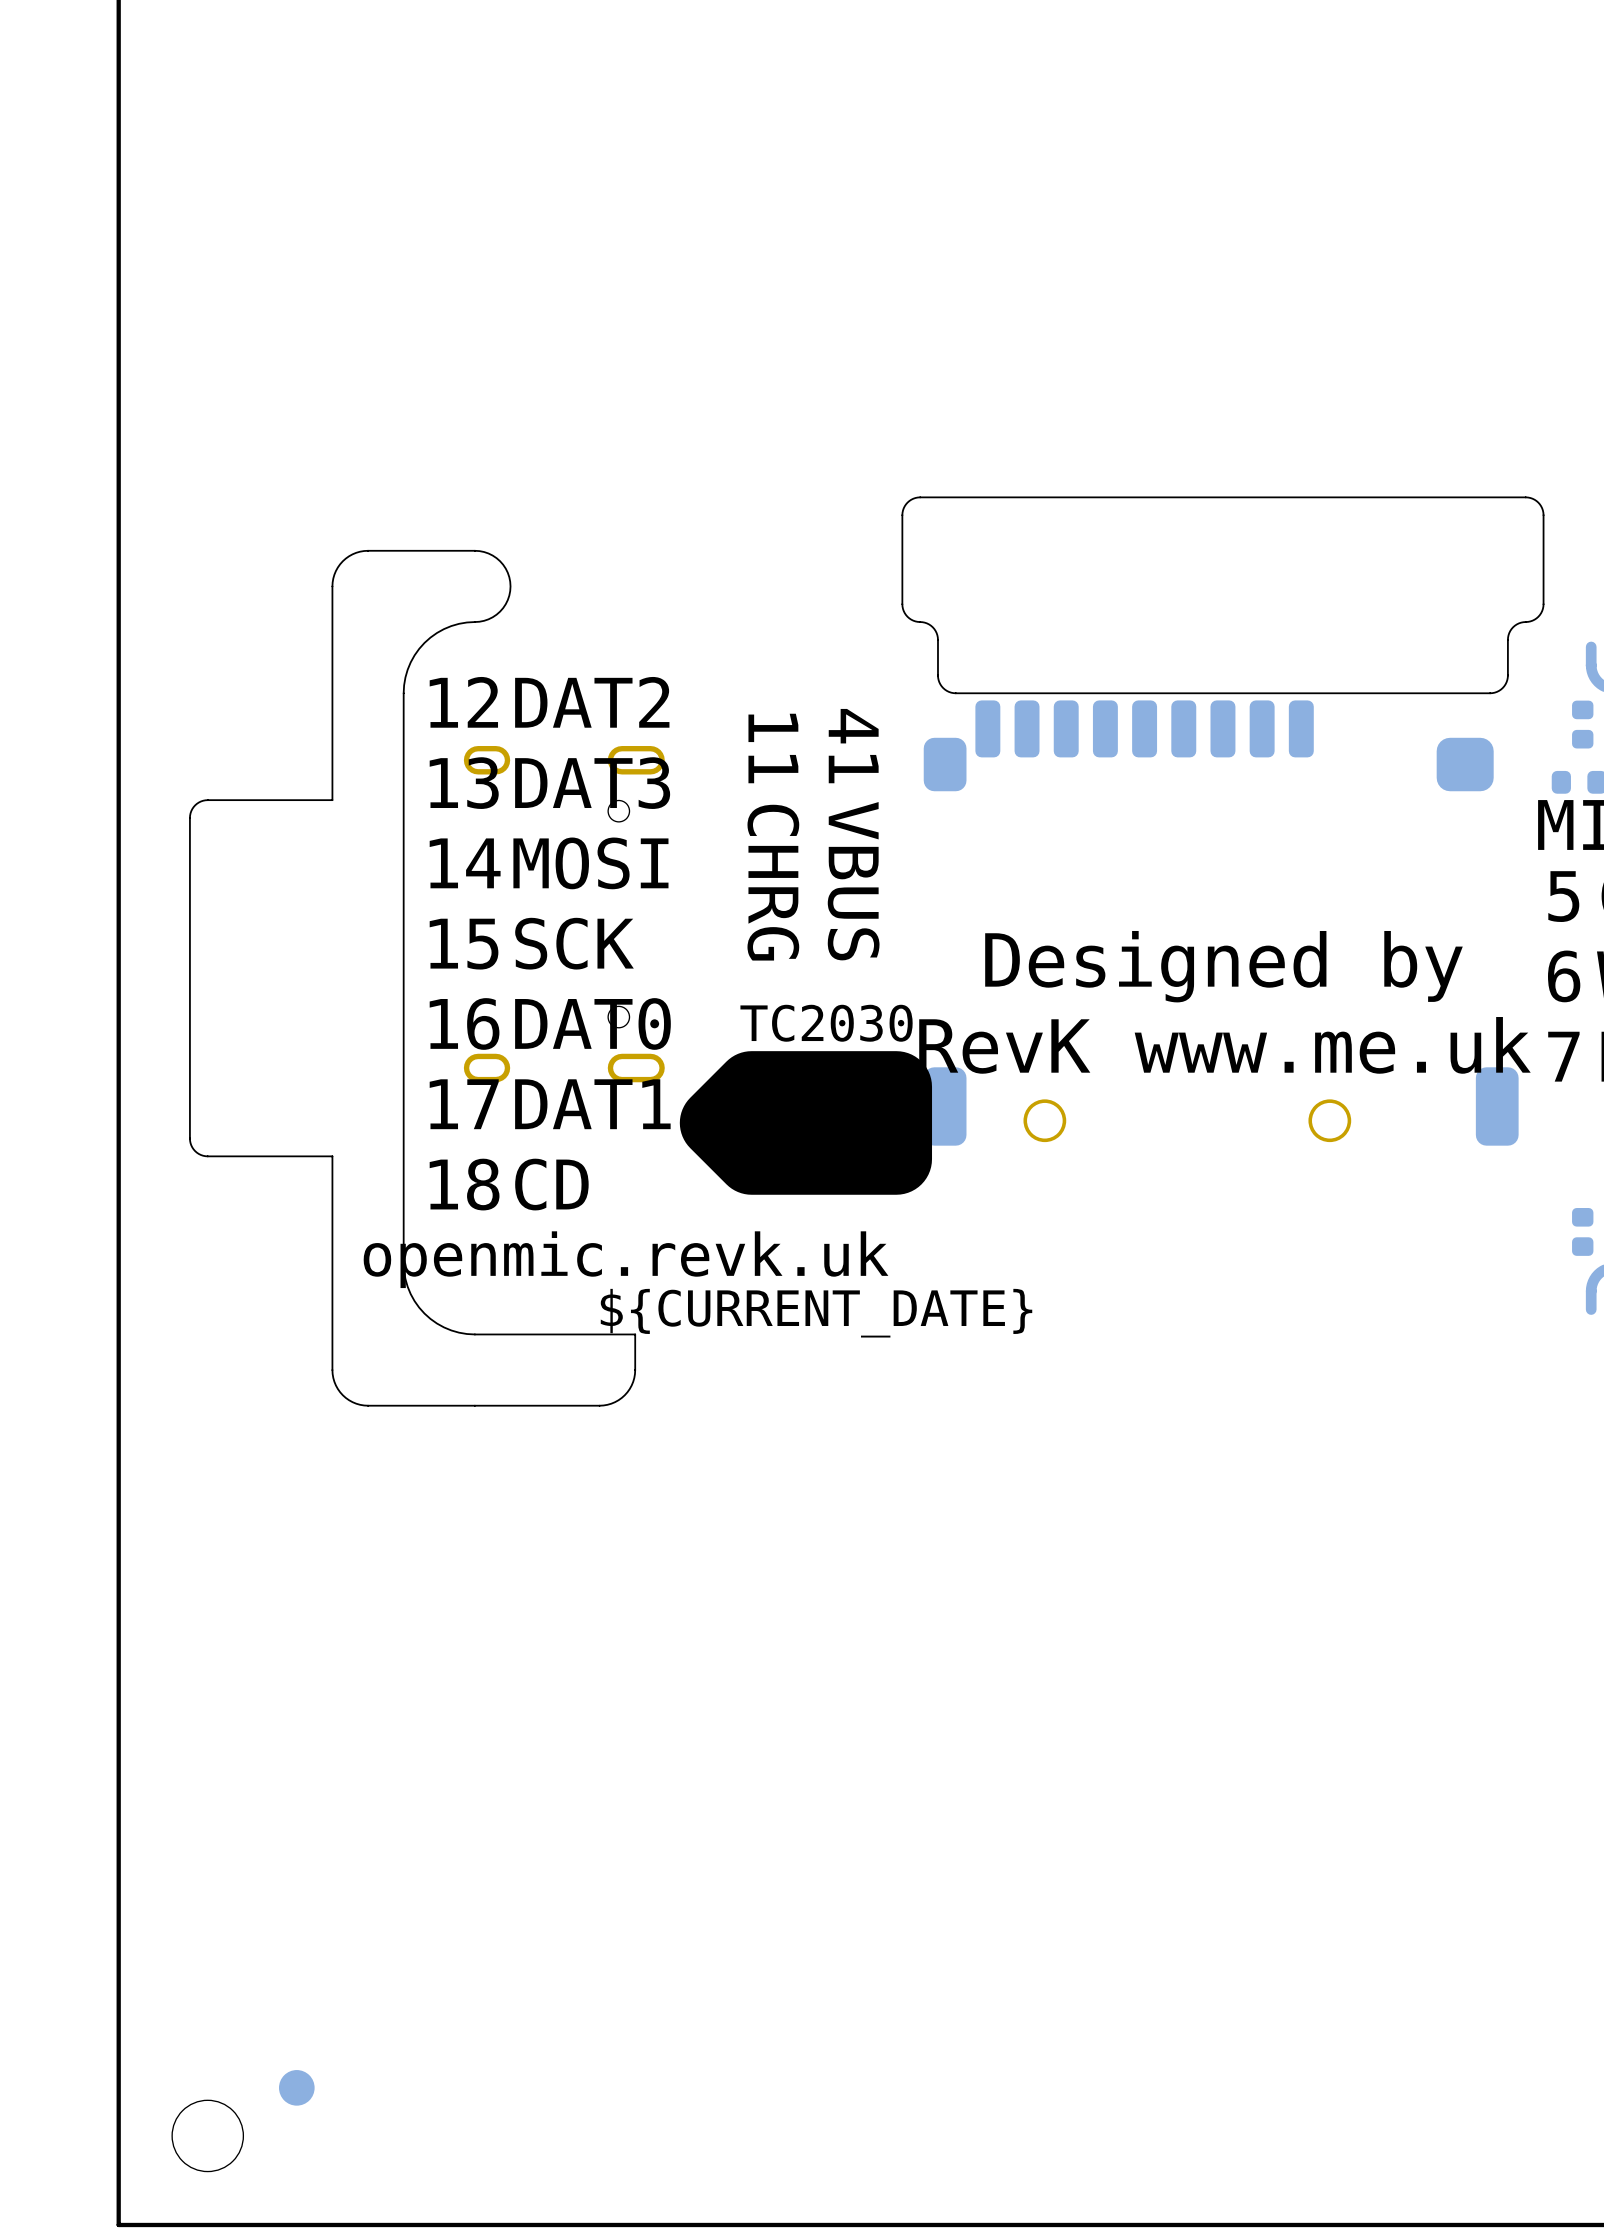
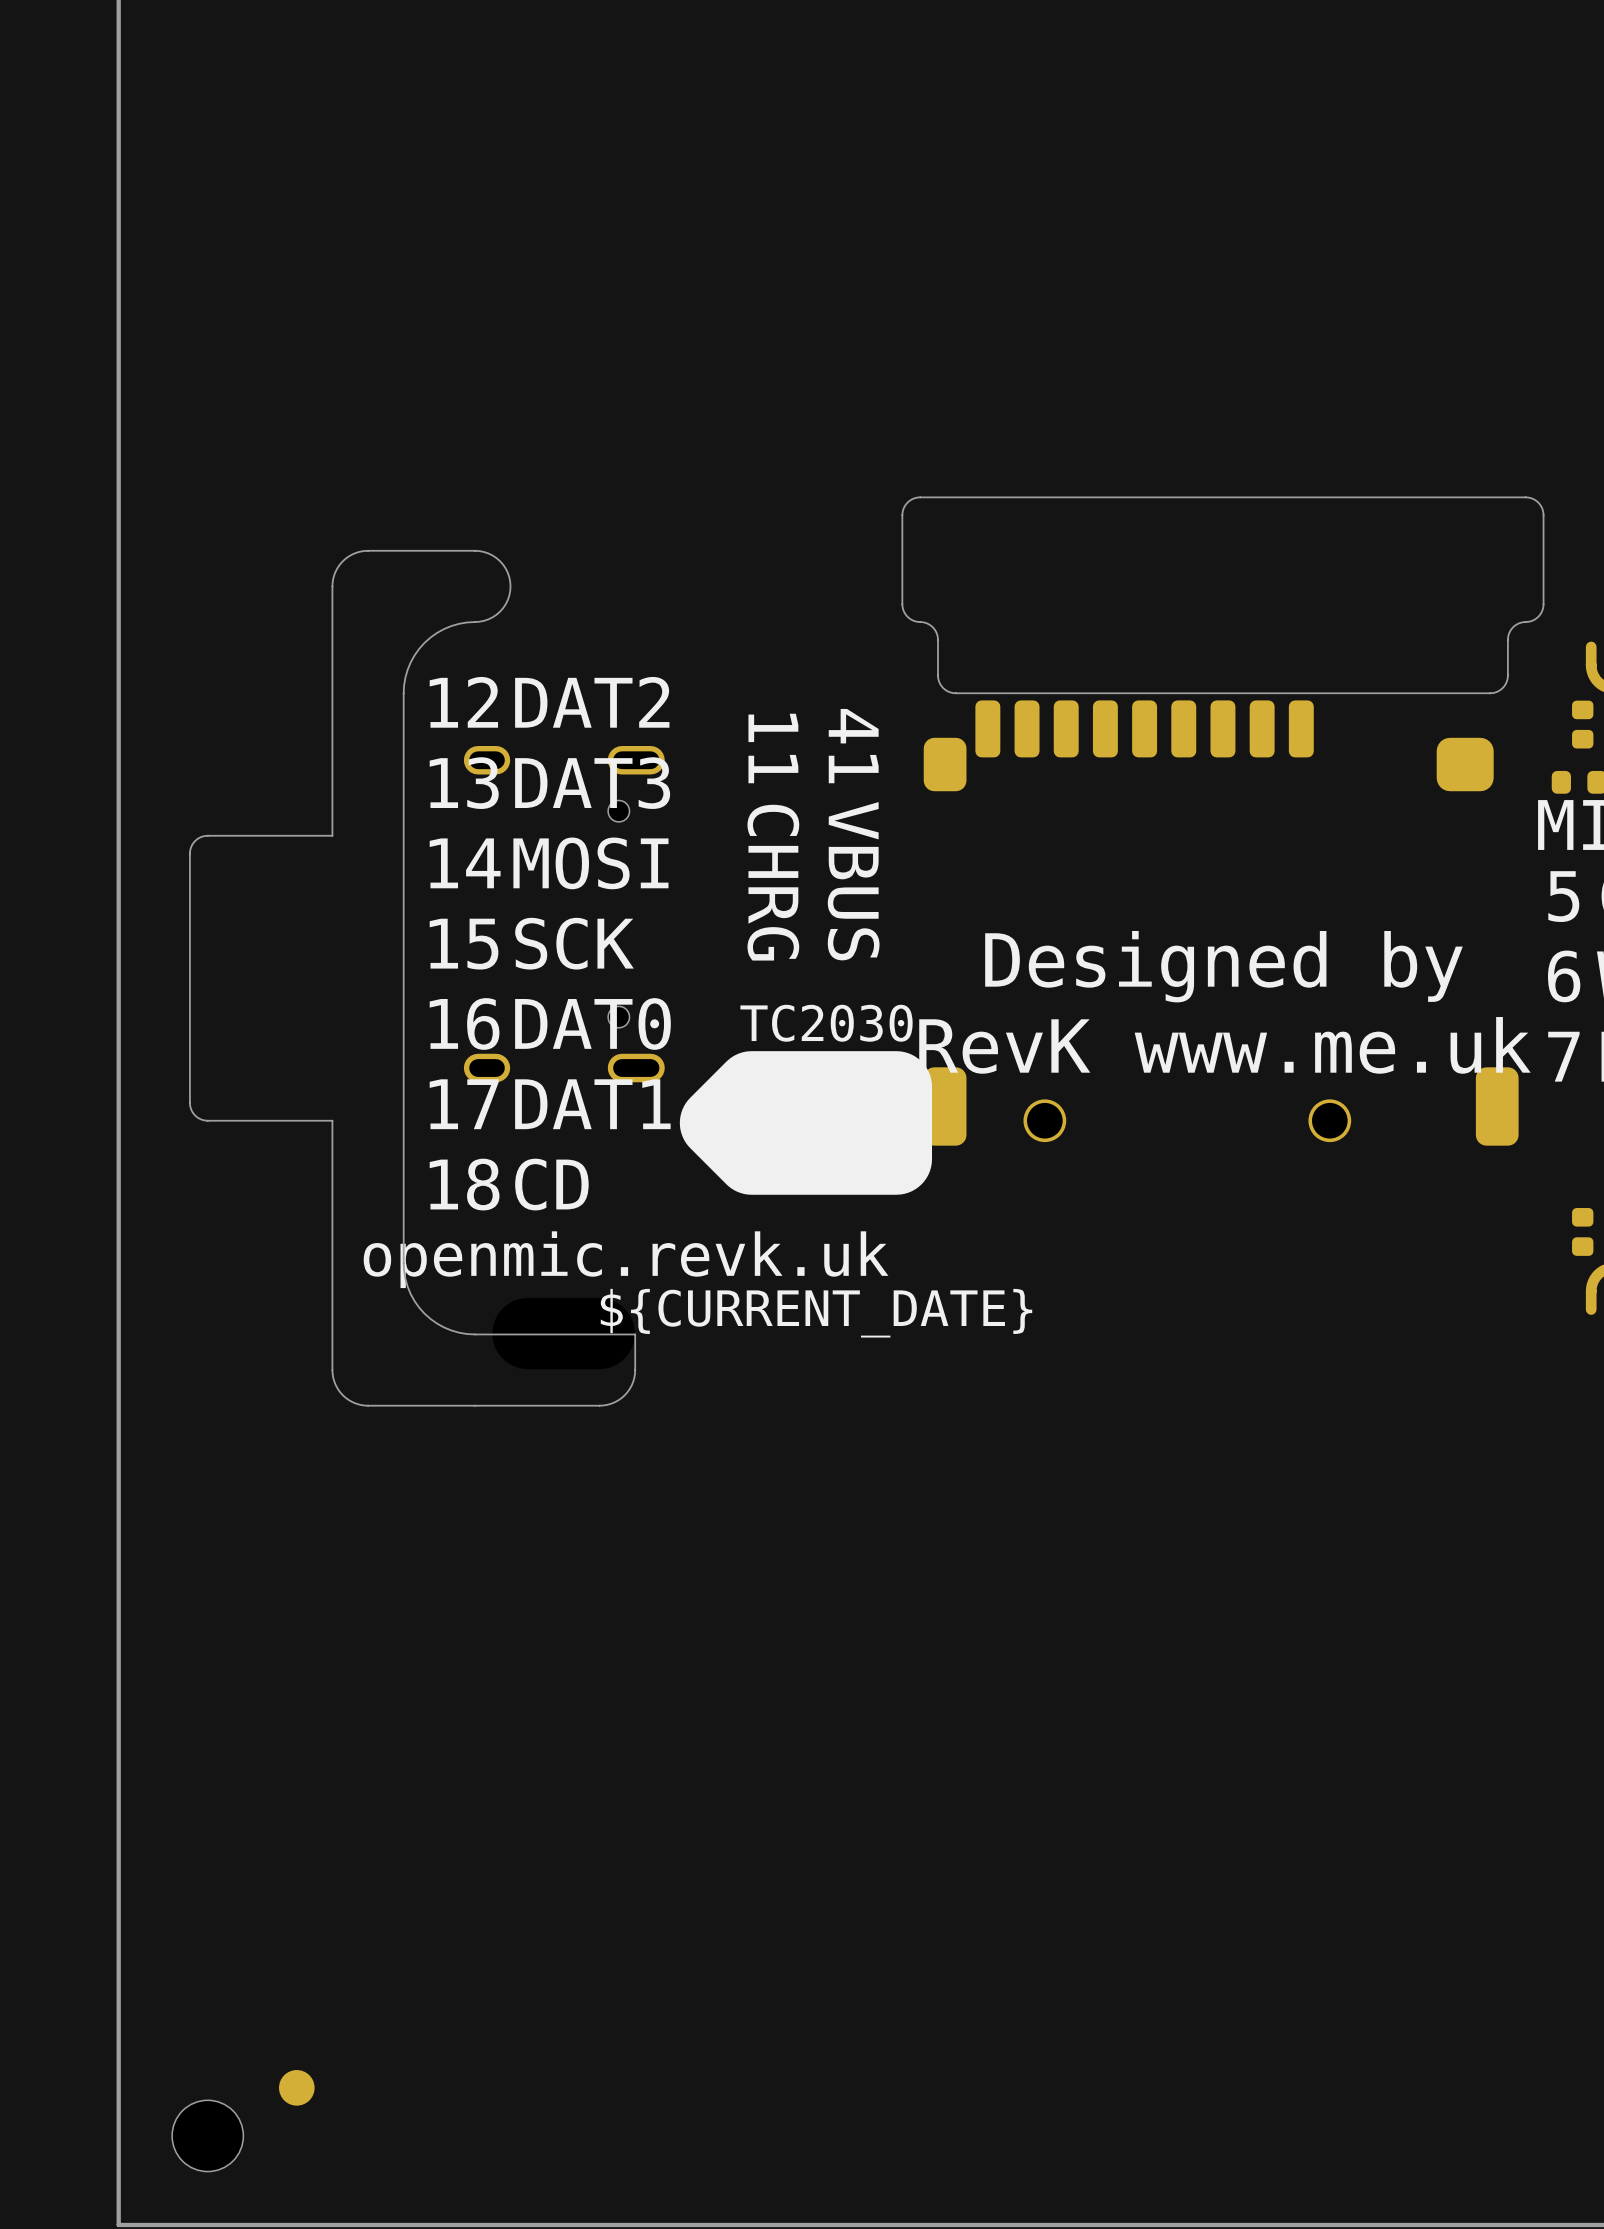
board edge: (332, 800) (200, 801) (195, 805) (190, 813) (189, 853) -> (332, 800) (332, 835) (205, 835) (195, 840) (189, 853)
board edge: (189, 1102) (190, 1143) (193, 1149) (200, 1155) (332, 1156) -> (189, 1102) (193, 1113) (205, 1120) (332, 1120) (332, 1156)

